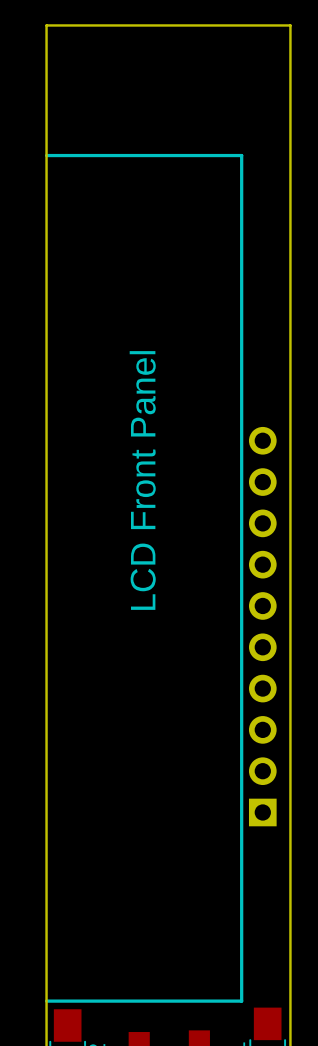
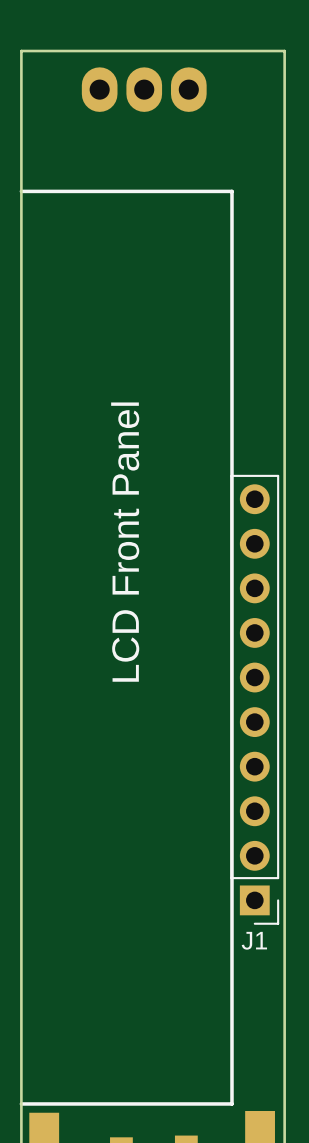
part: none -> (144, 89)
J1: none -> (254, 699)

